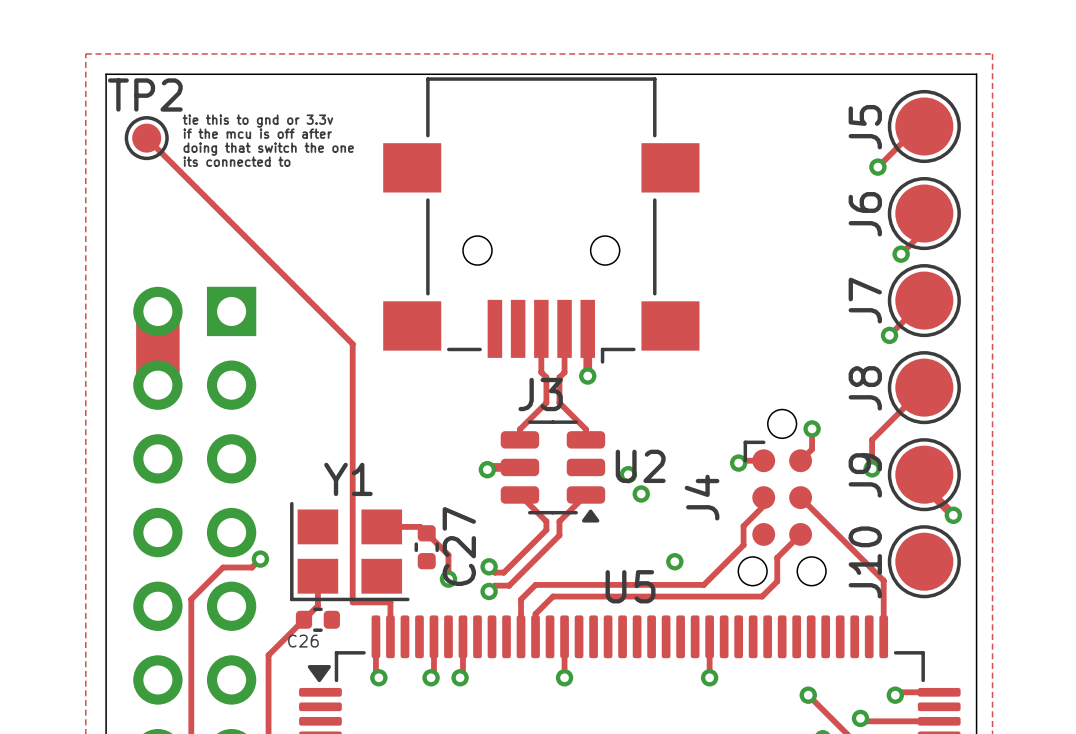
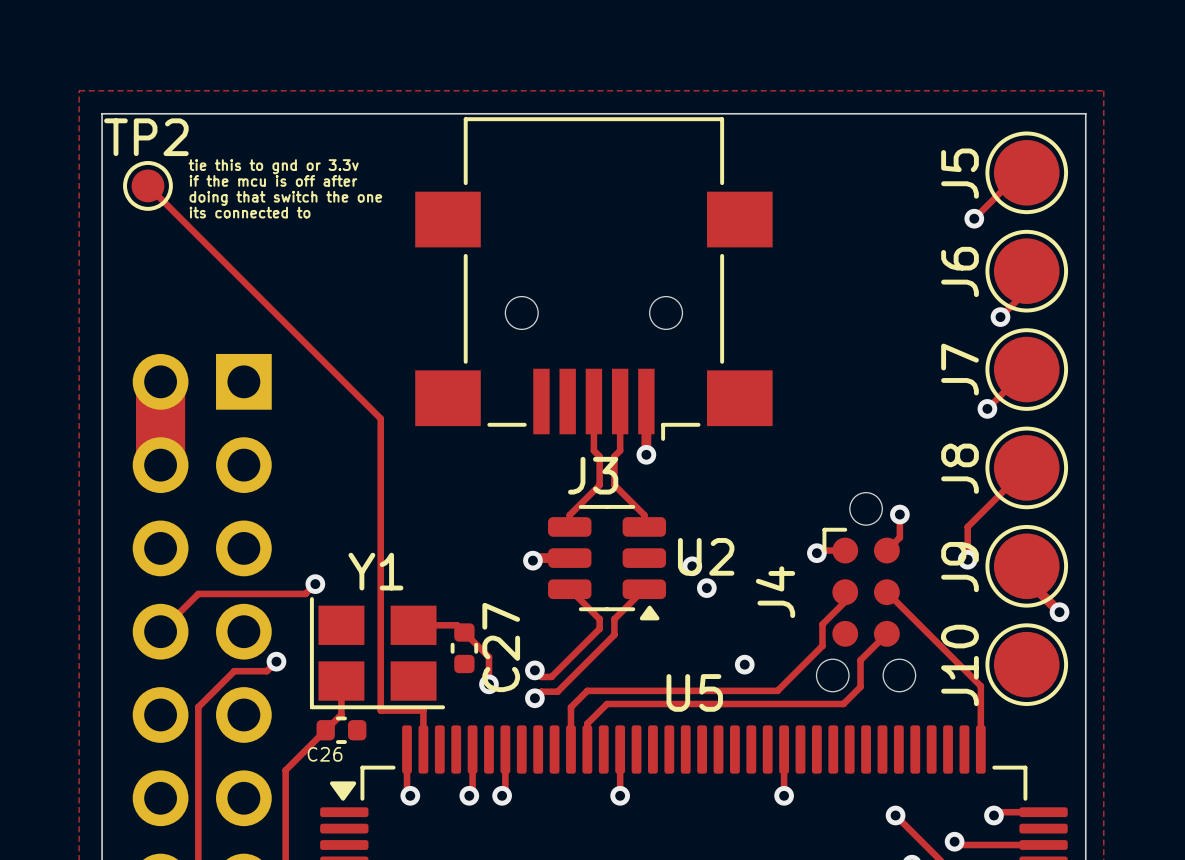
track: none -> (315, 584) (305, 593) (198, 593) (160, 631)
via: none -> (315, 584)

